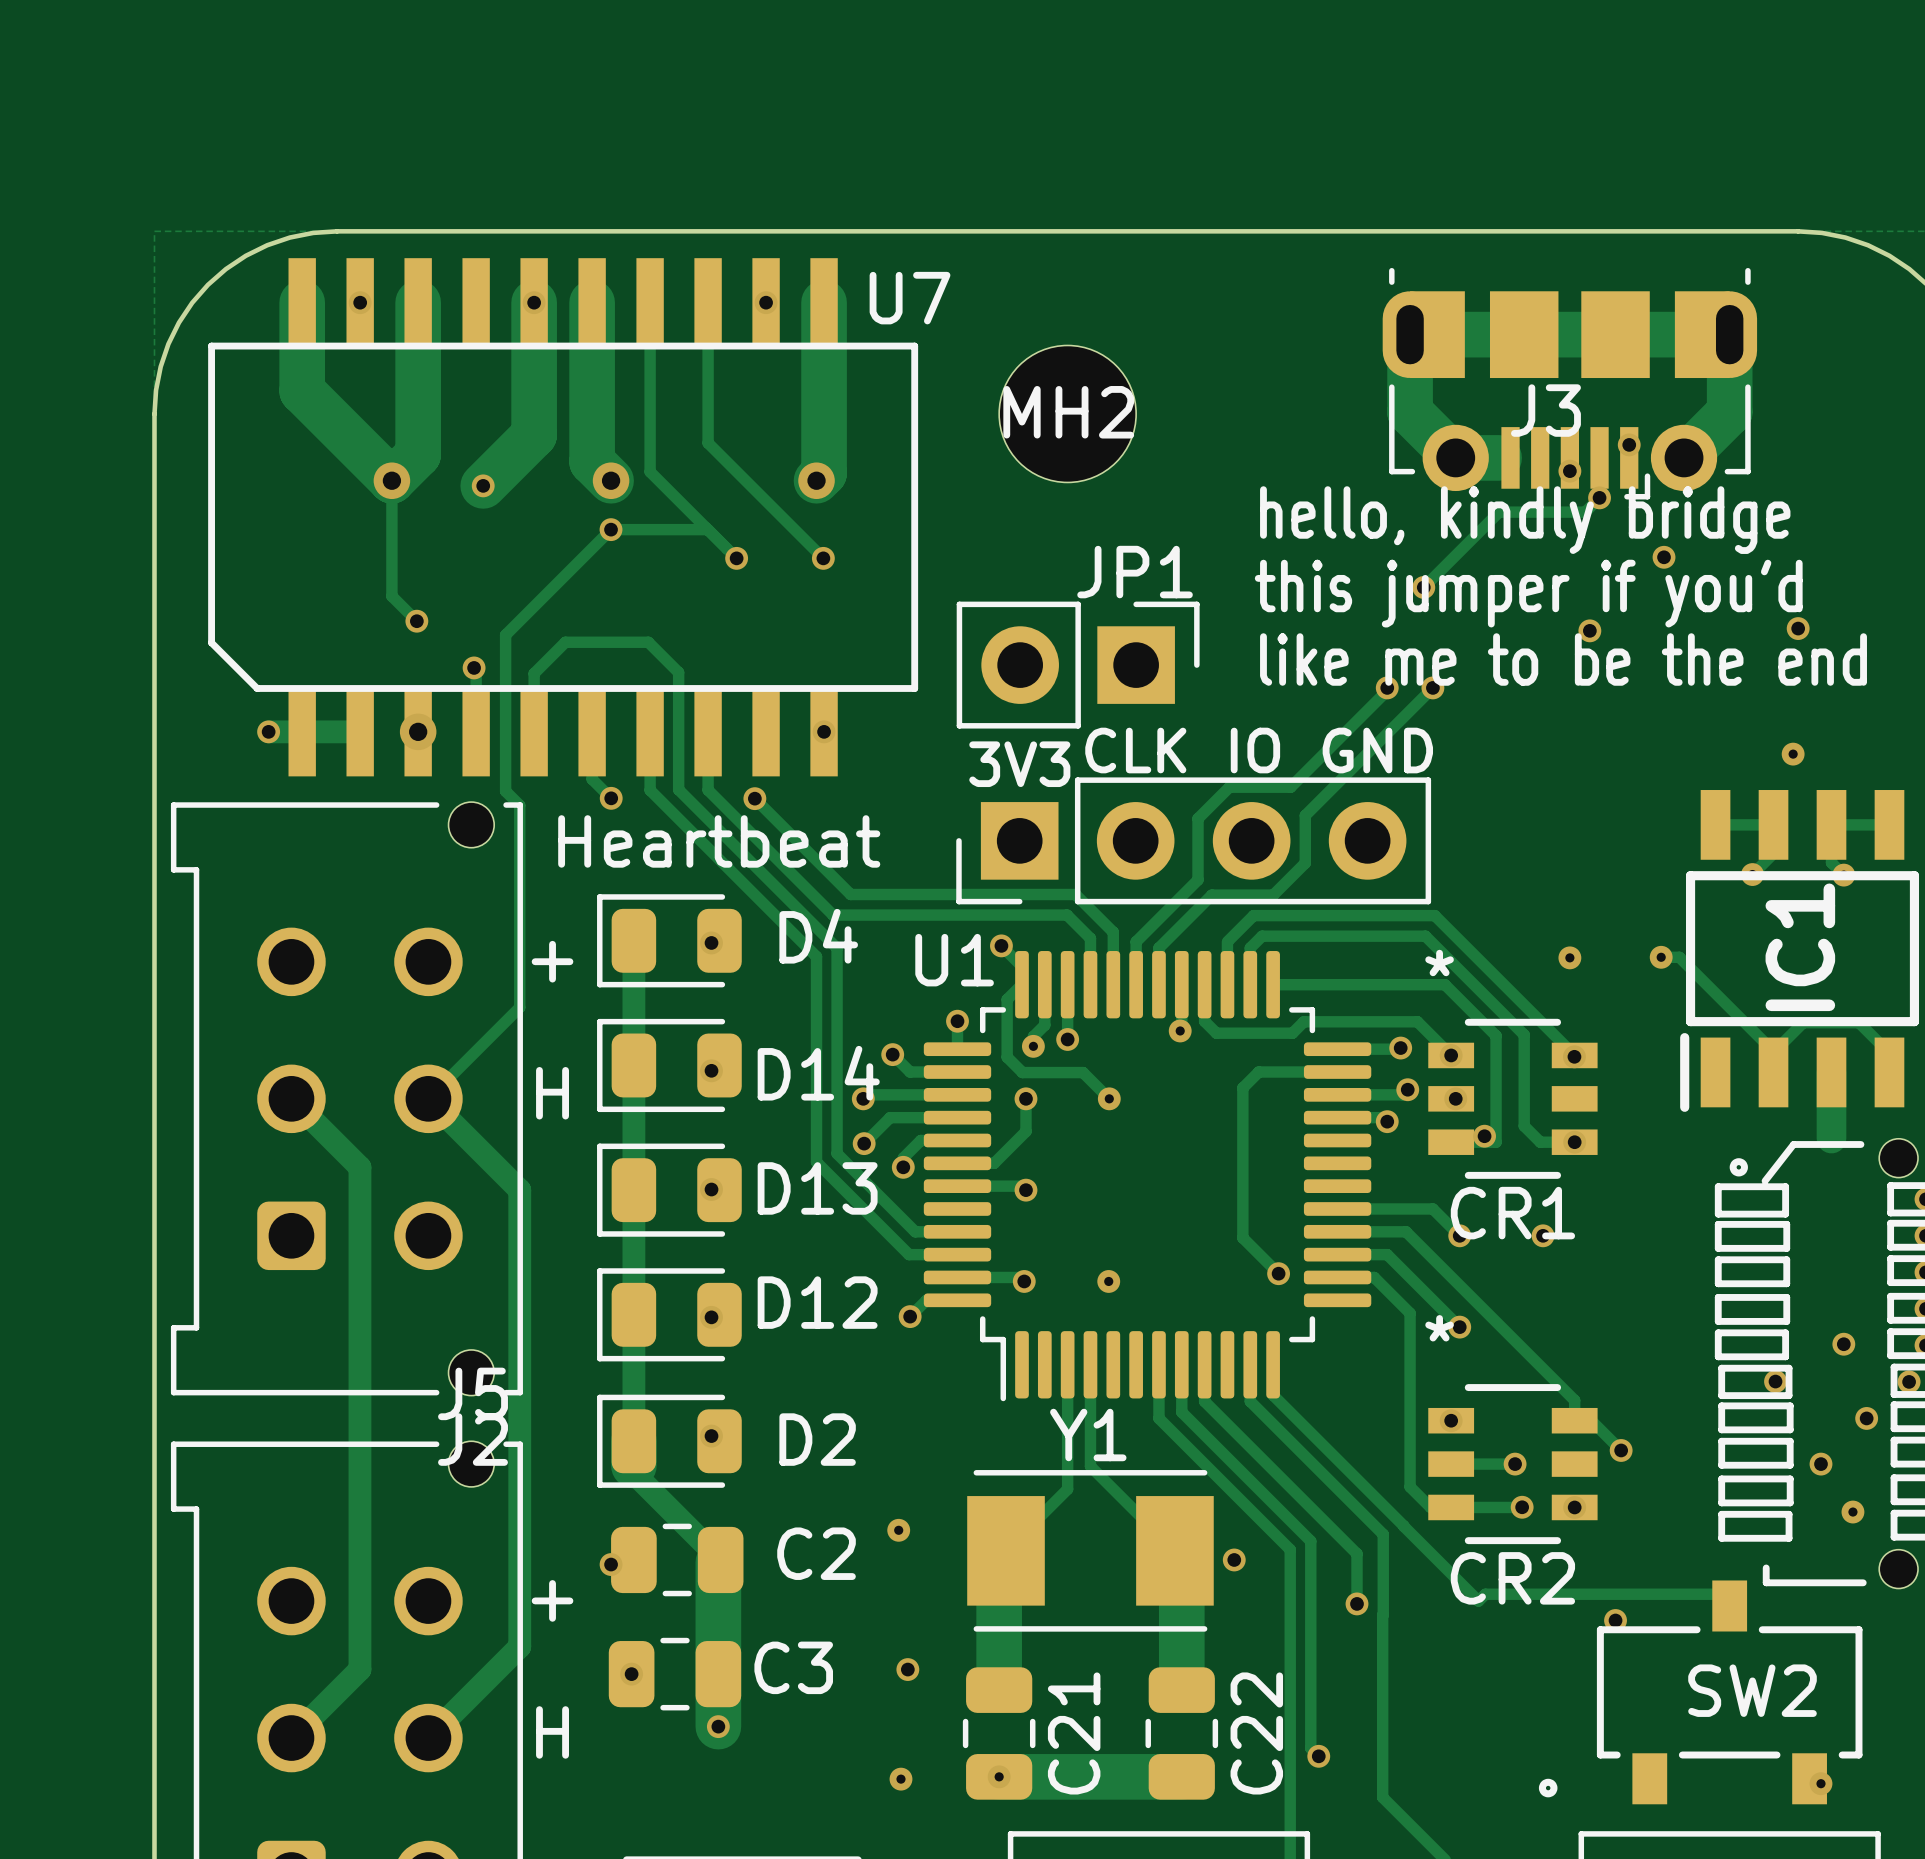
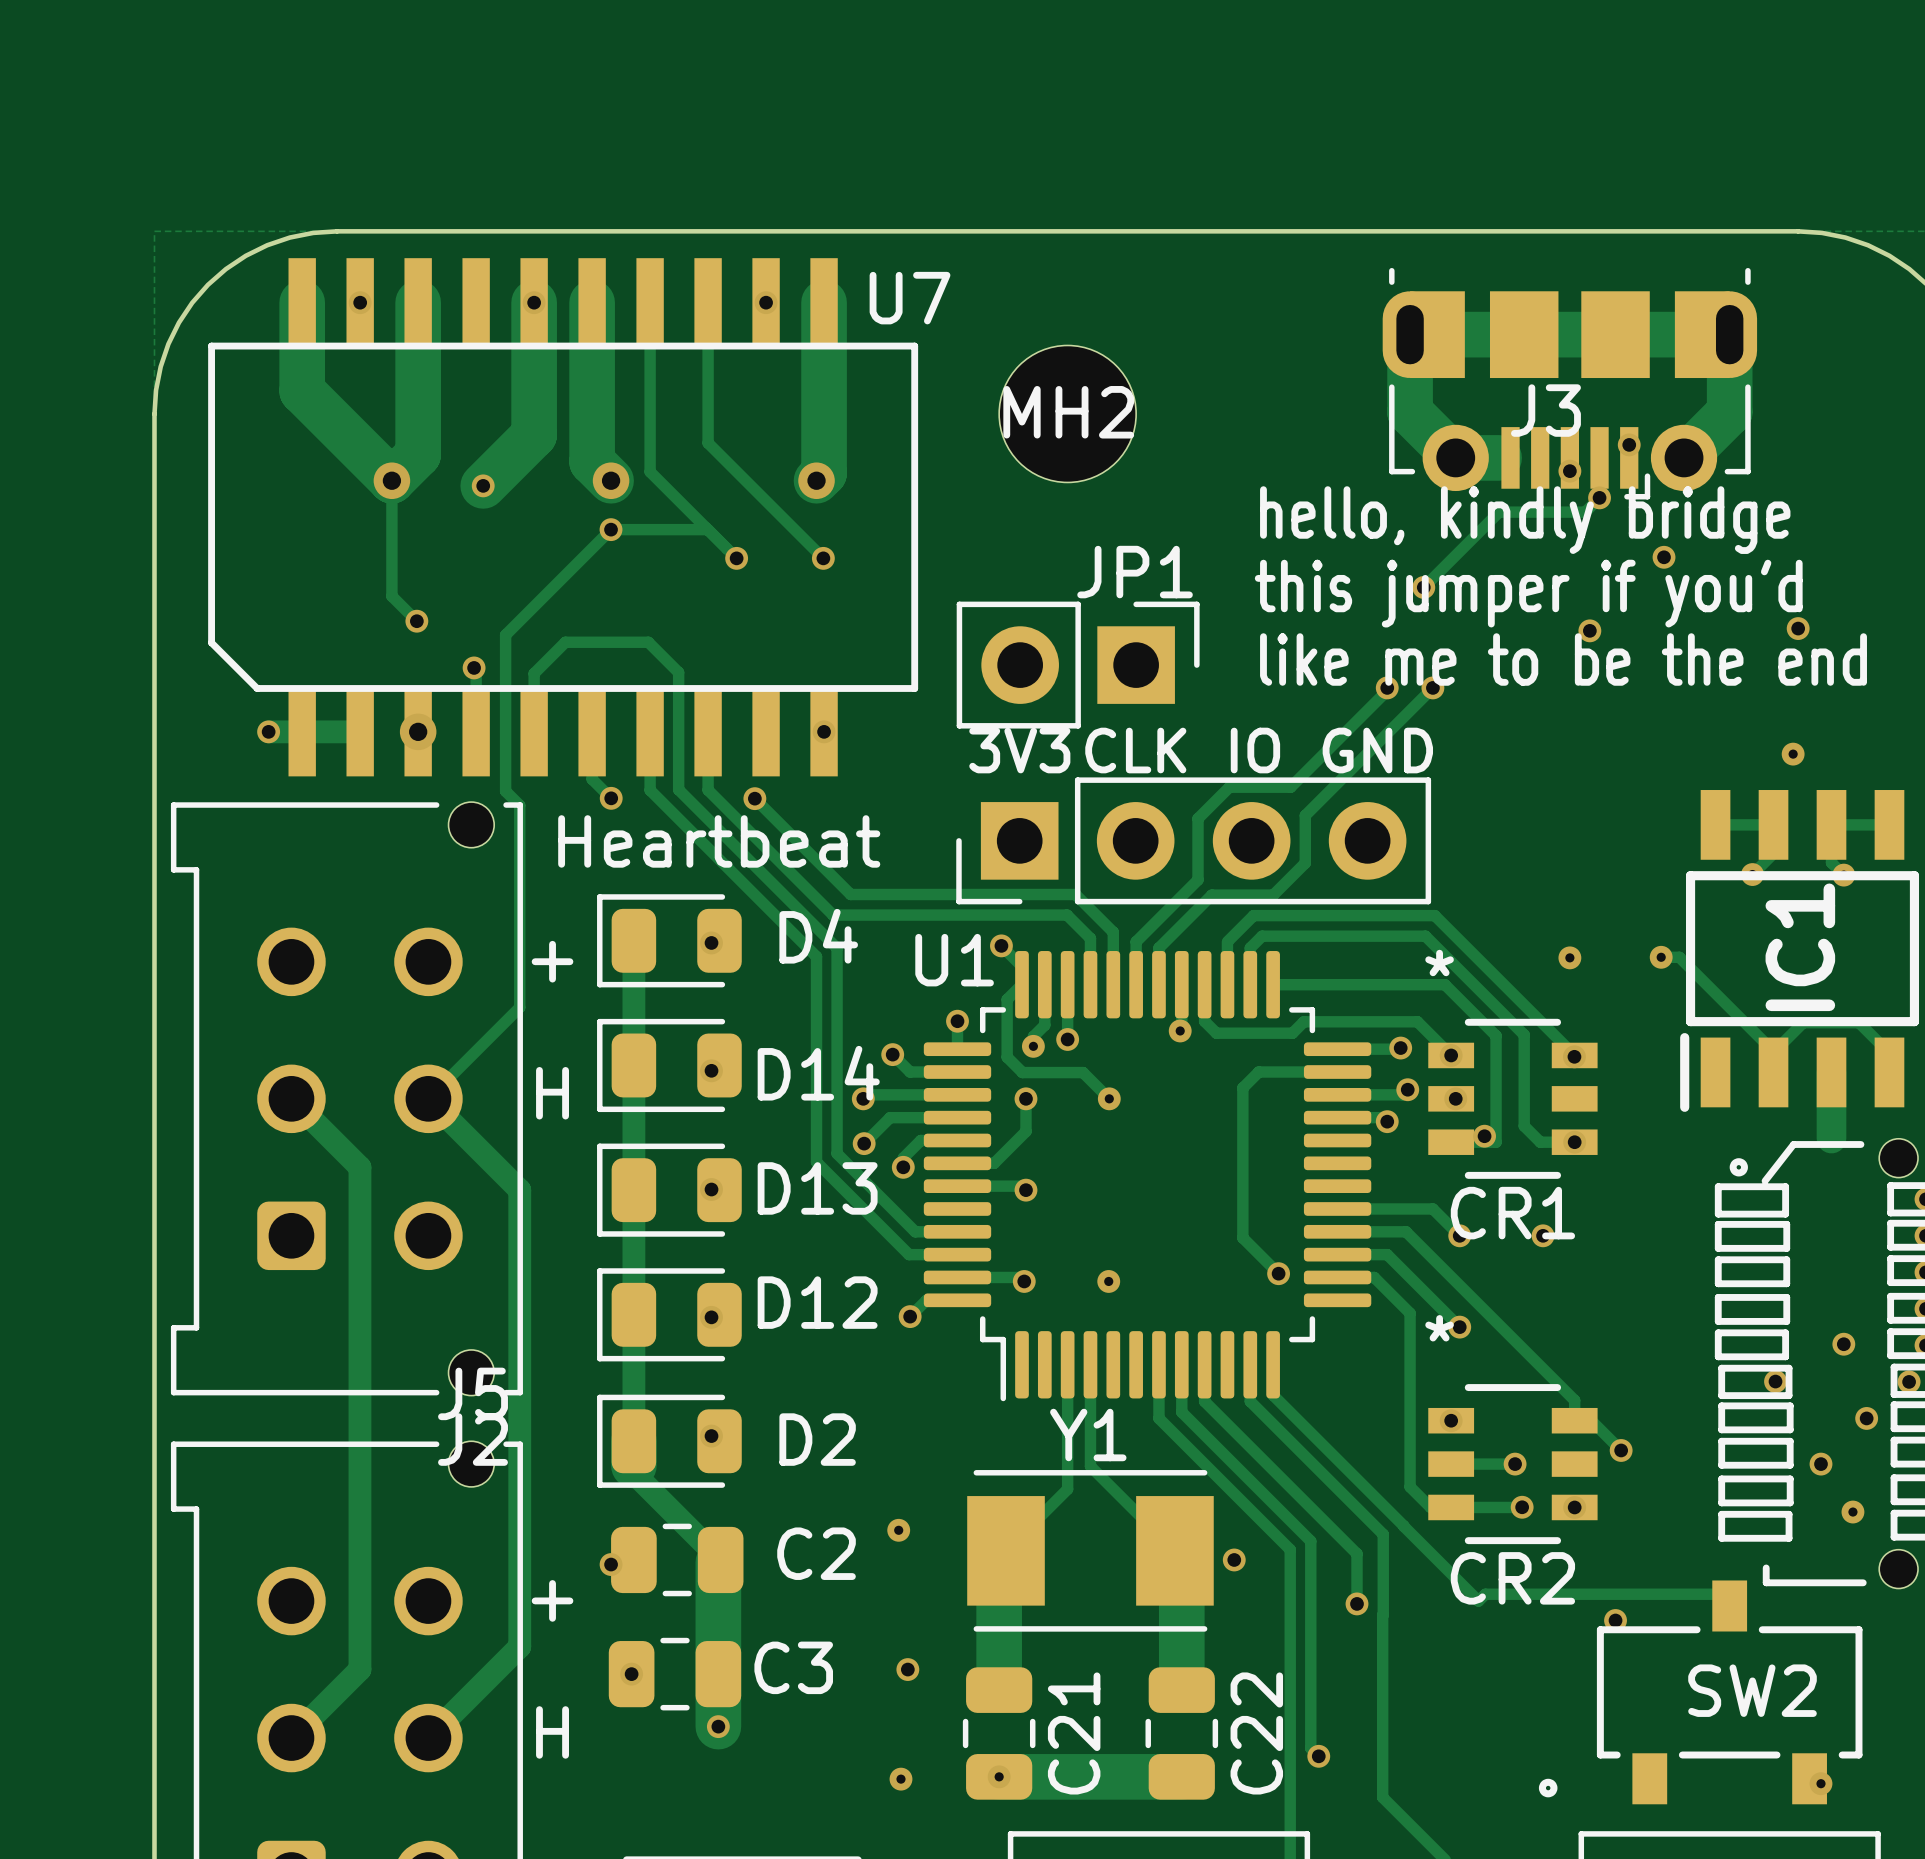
text position: 3V3 (1019, 764) -> 3V3 (1019, 750)

